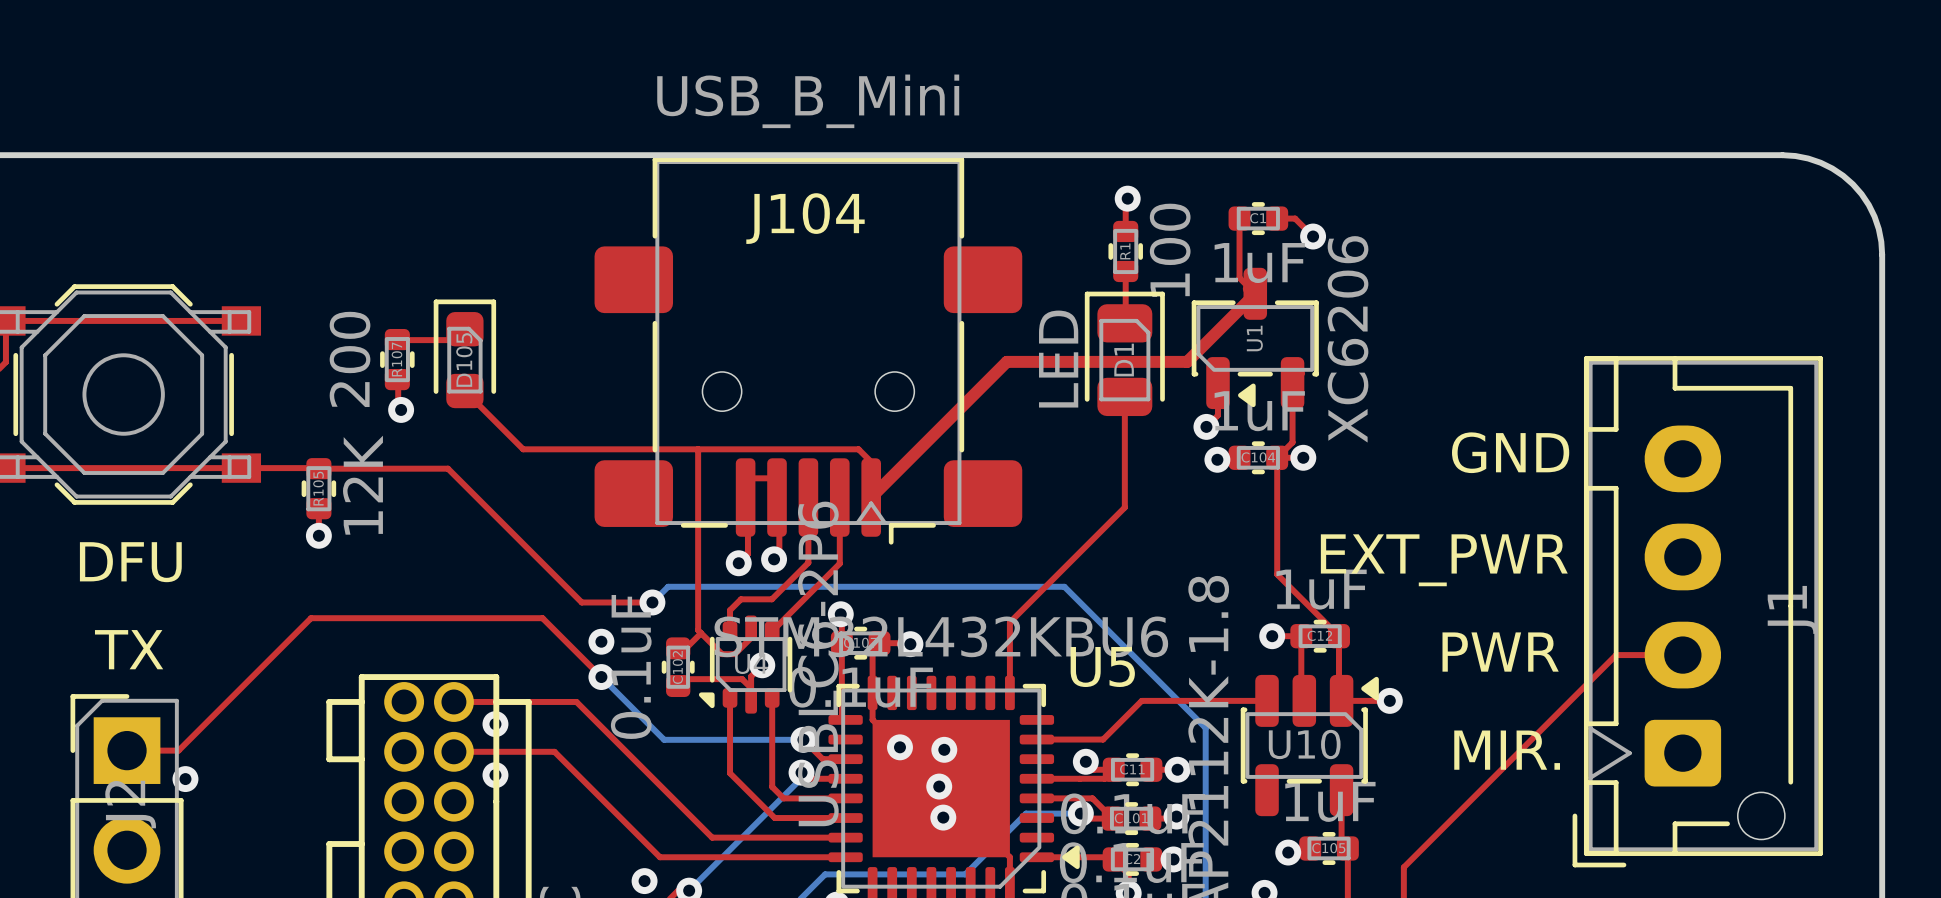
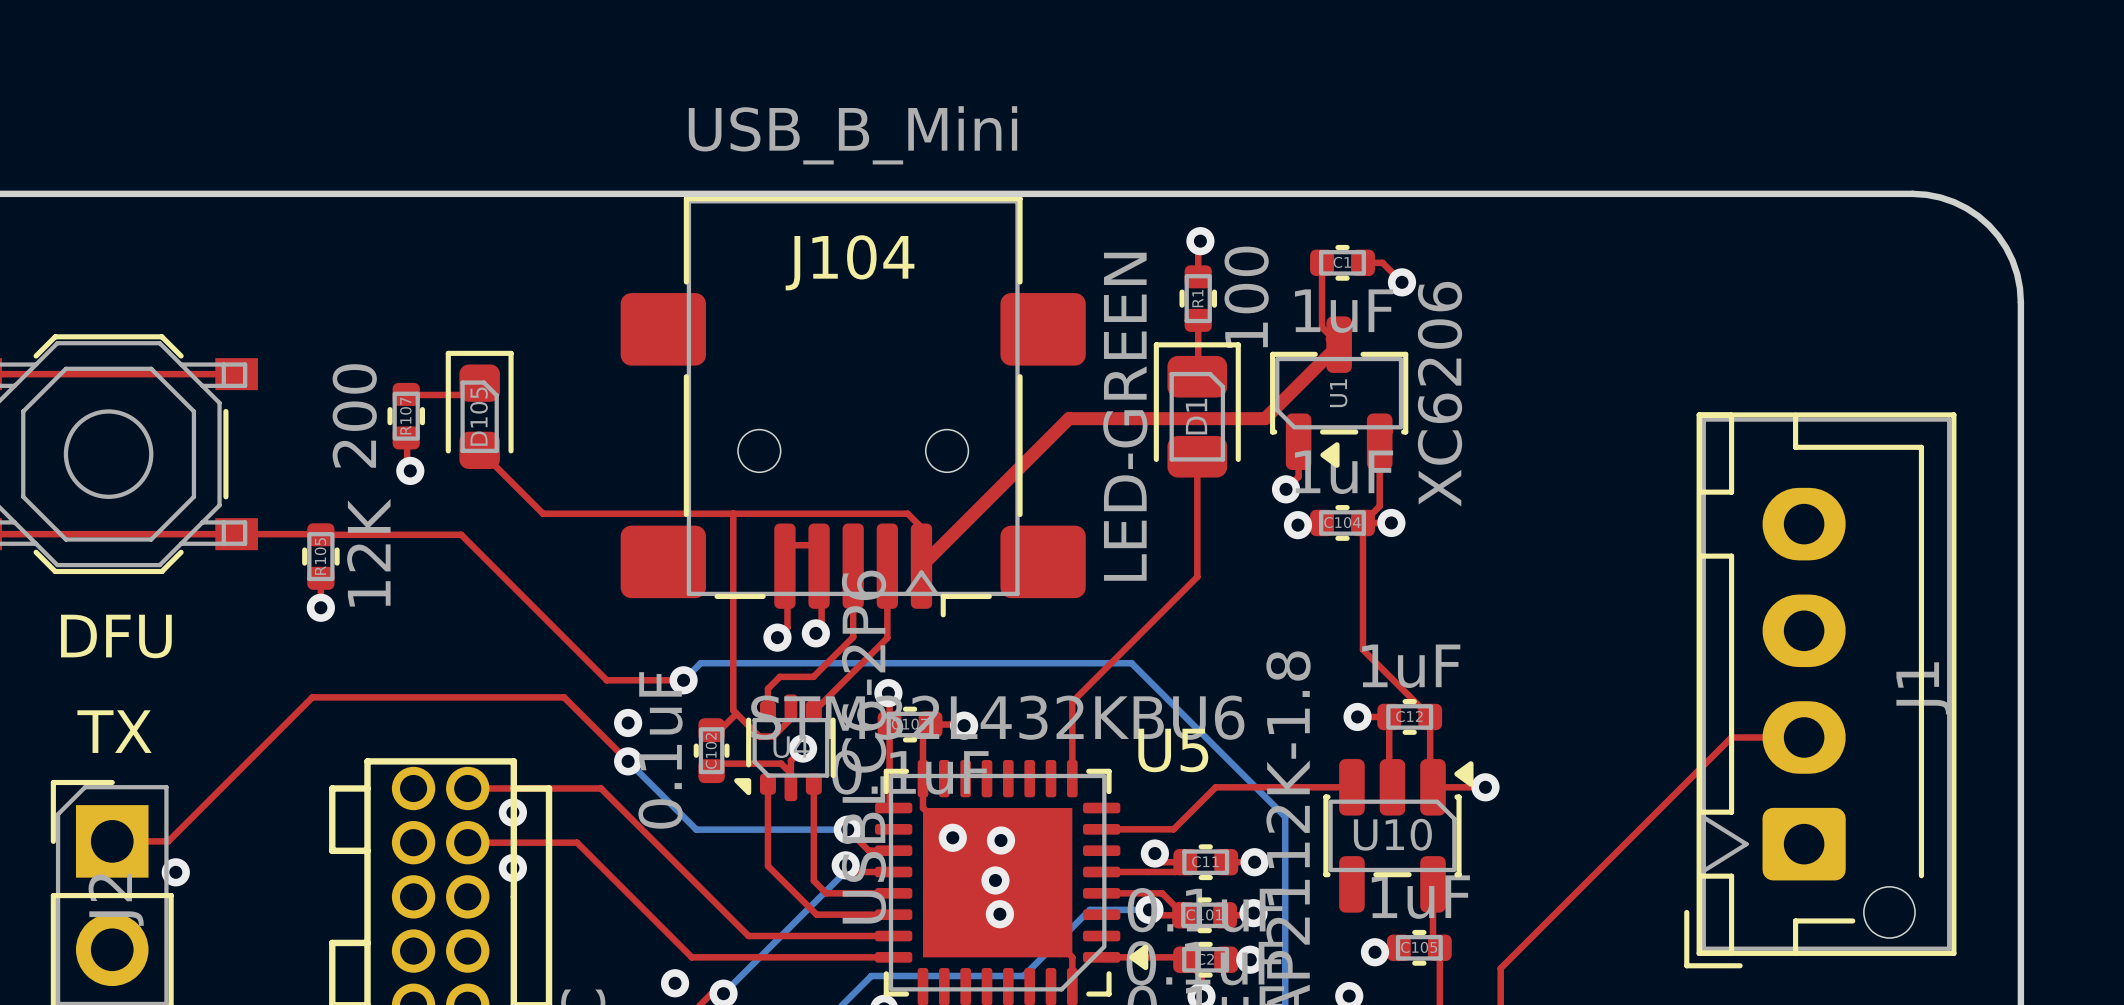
D1 value: LED (1058, 359) -> LED-GREEN (1125, 416)
text: GND (1510, 452) -> none
text: EXT_PWR (1444, 560) -> none
text: PWR (1500, 652) -> none
text: MIR. (1507, 750) -> none

